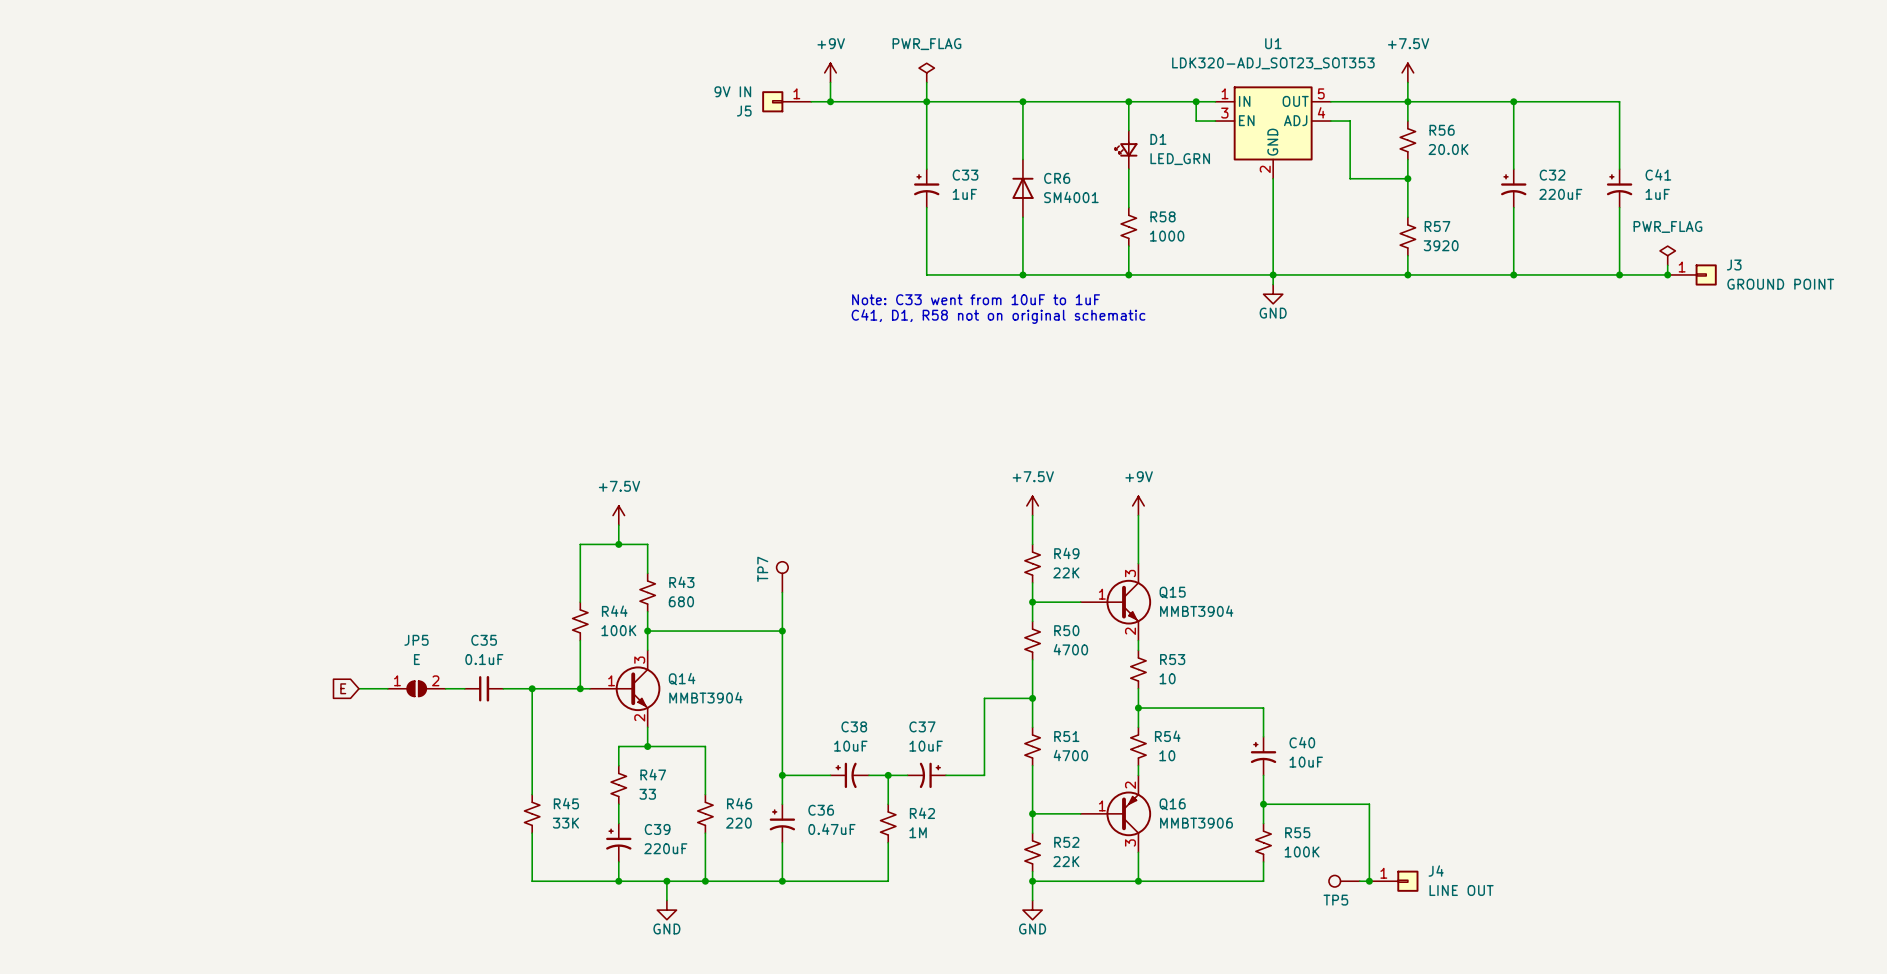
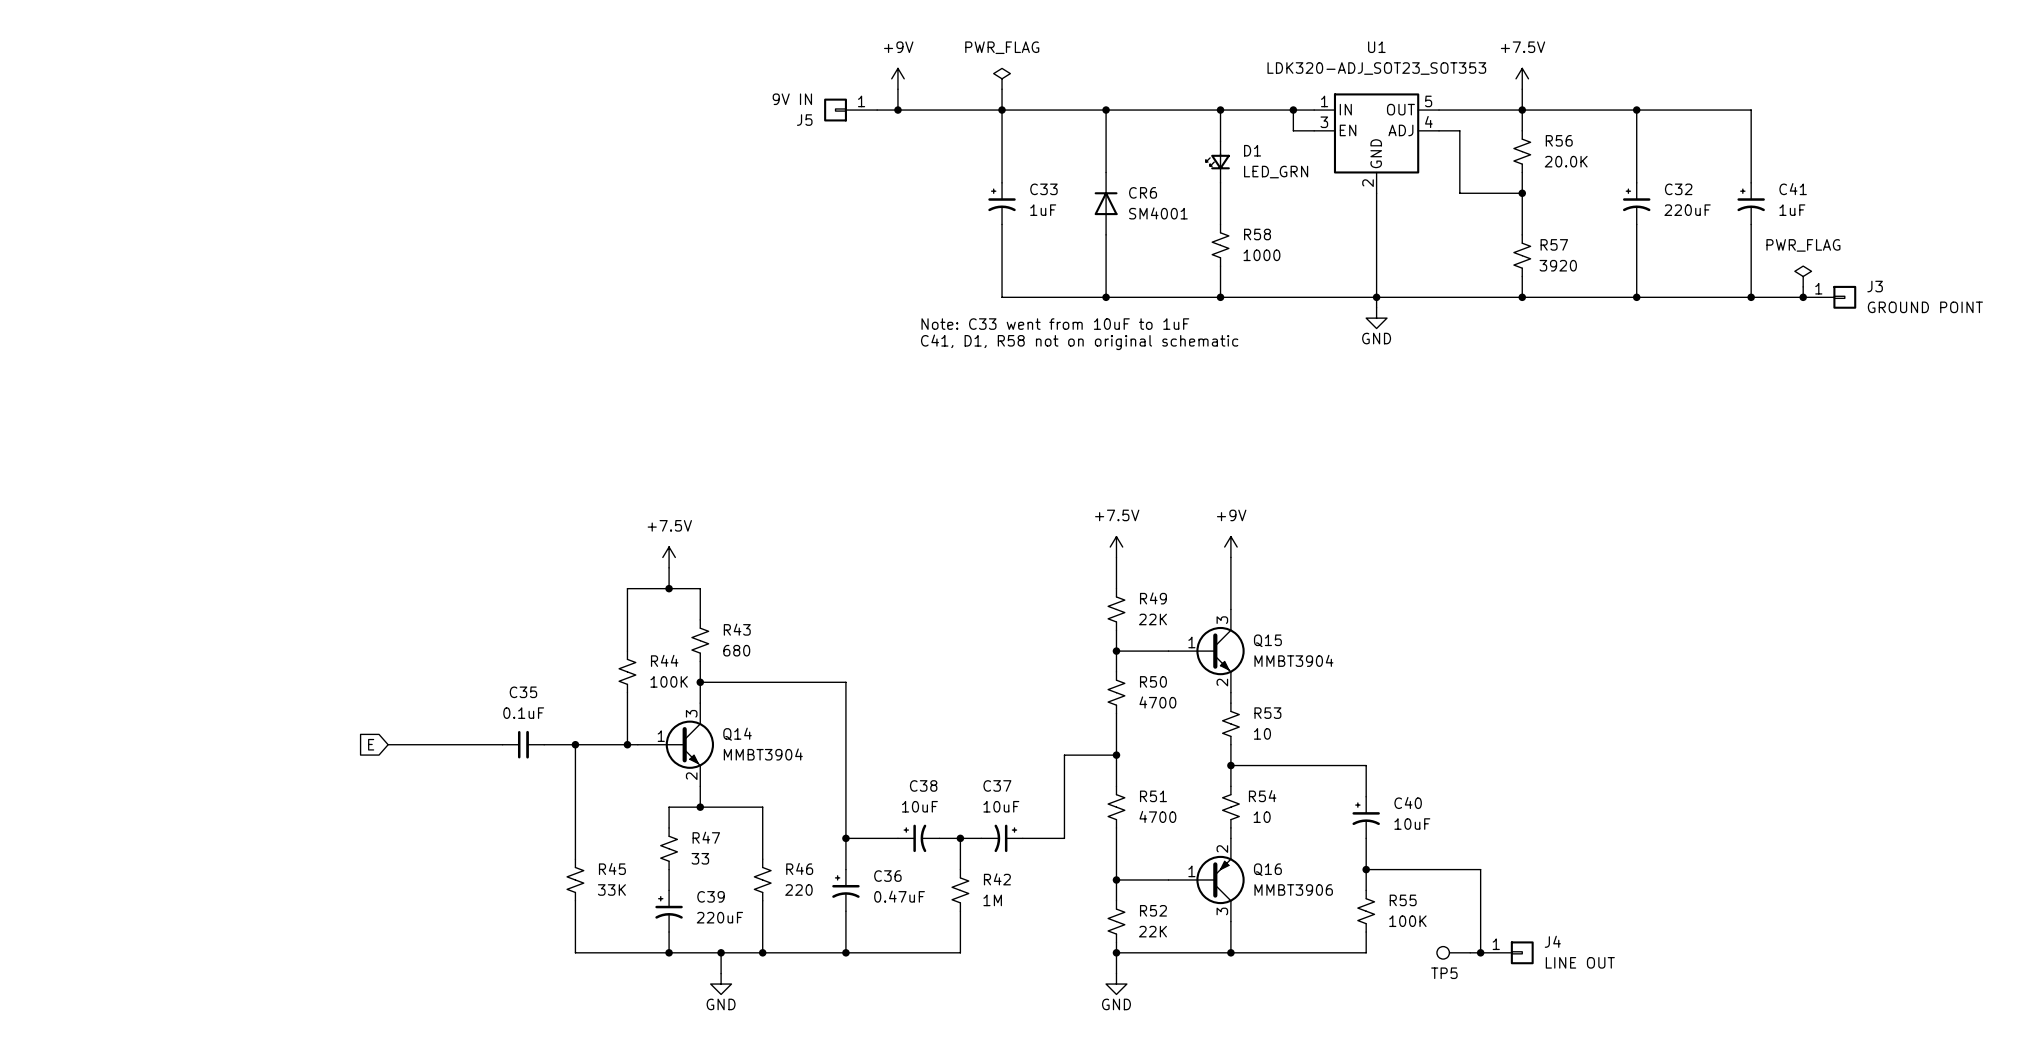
TP7: (782, 577) -> none
wire: (782, 592) (782, 631) -> none
junction: (782, 631) -> none
JP5: E (416, 688) -> none

